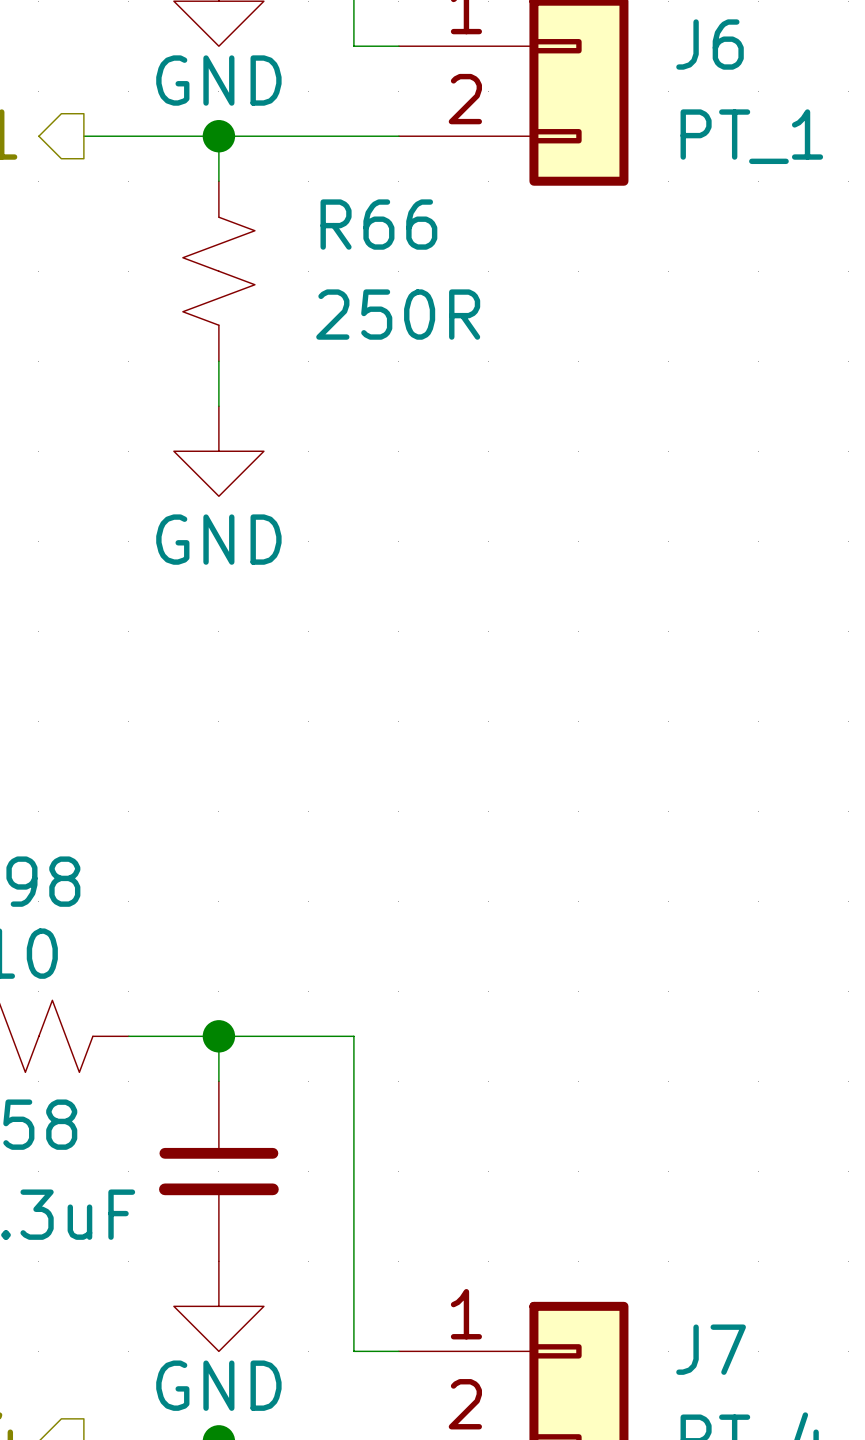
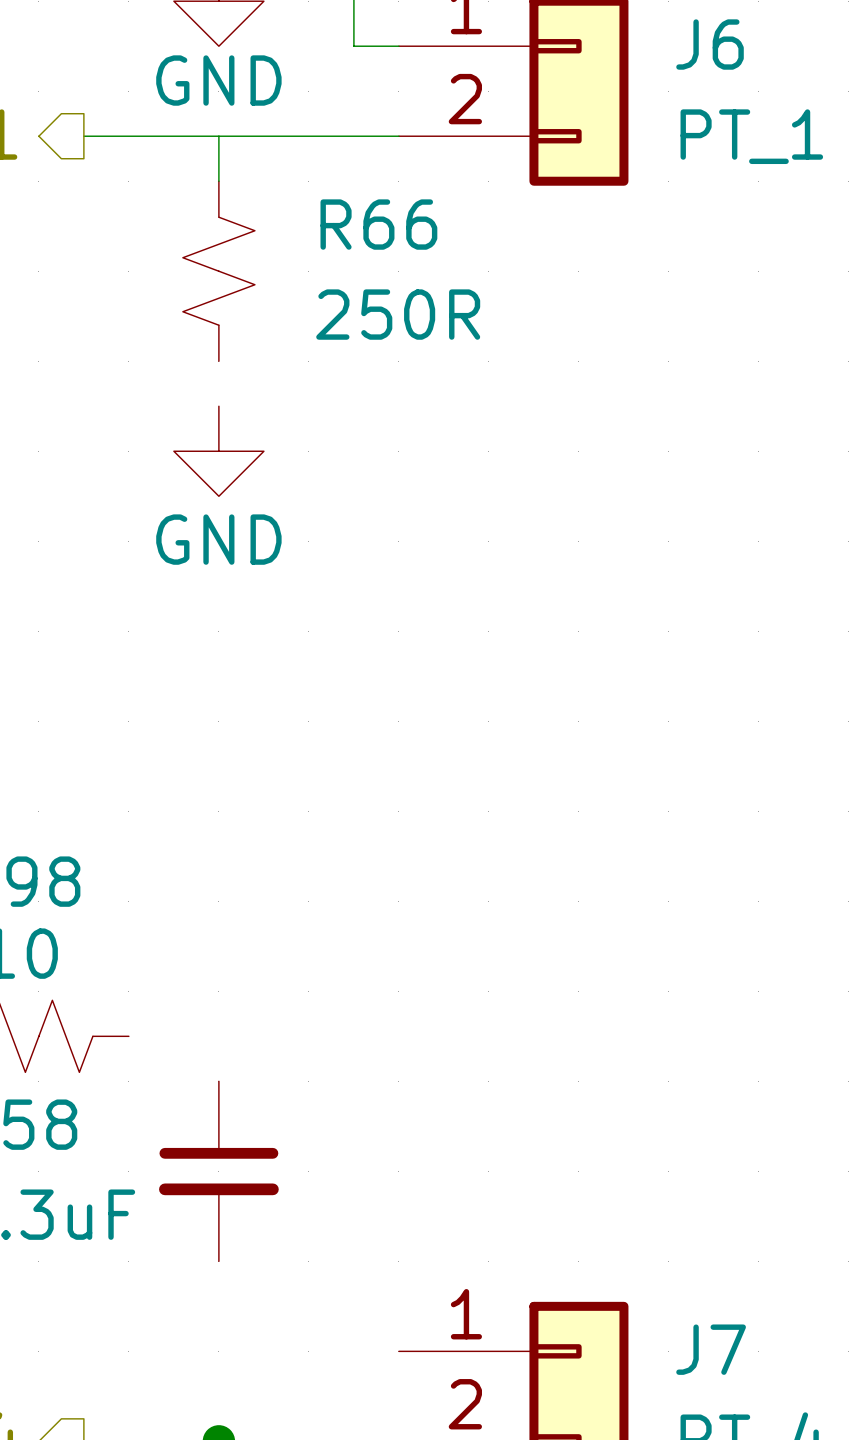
junction: (218, 136) -> none
wire: (218, 361) (218, 406) -> none
wire: (128, 1036) (353, 1036) (353, 1351) (398, 1351) -> none
wire: (218, 1036) (218, 1081) -> none
junction: (218, 1036) -> none
power symbol: GND (218, 1306) -> none

